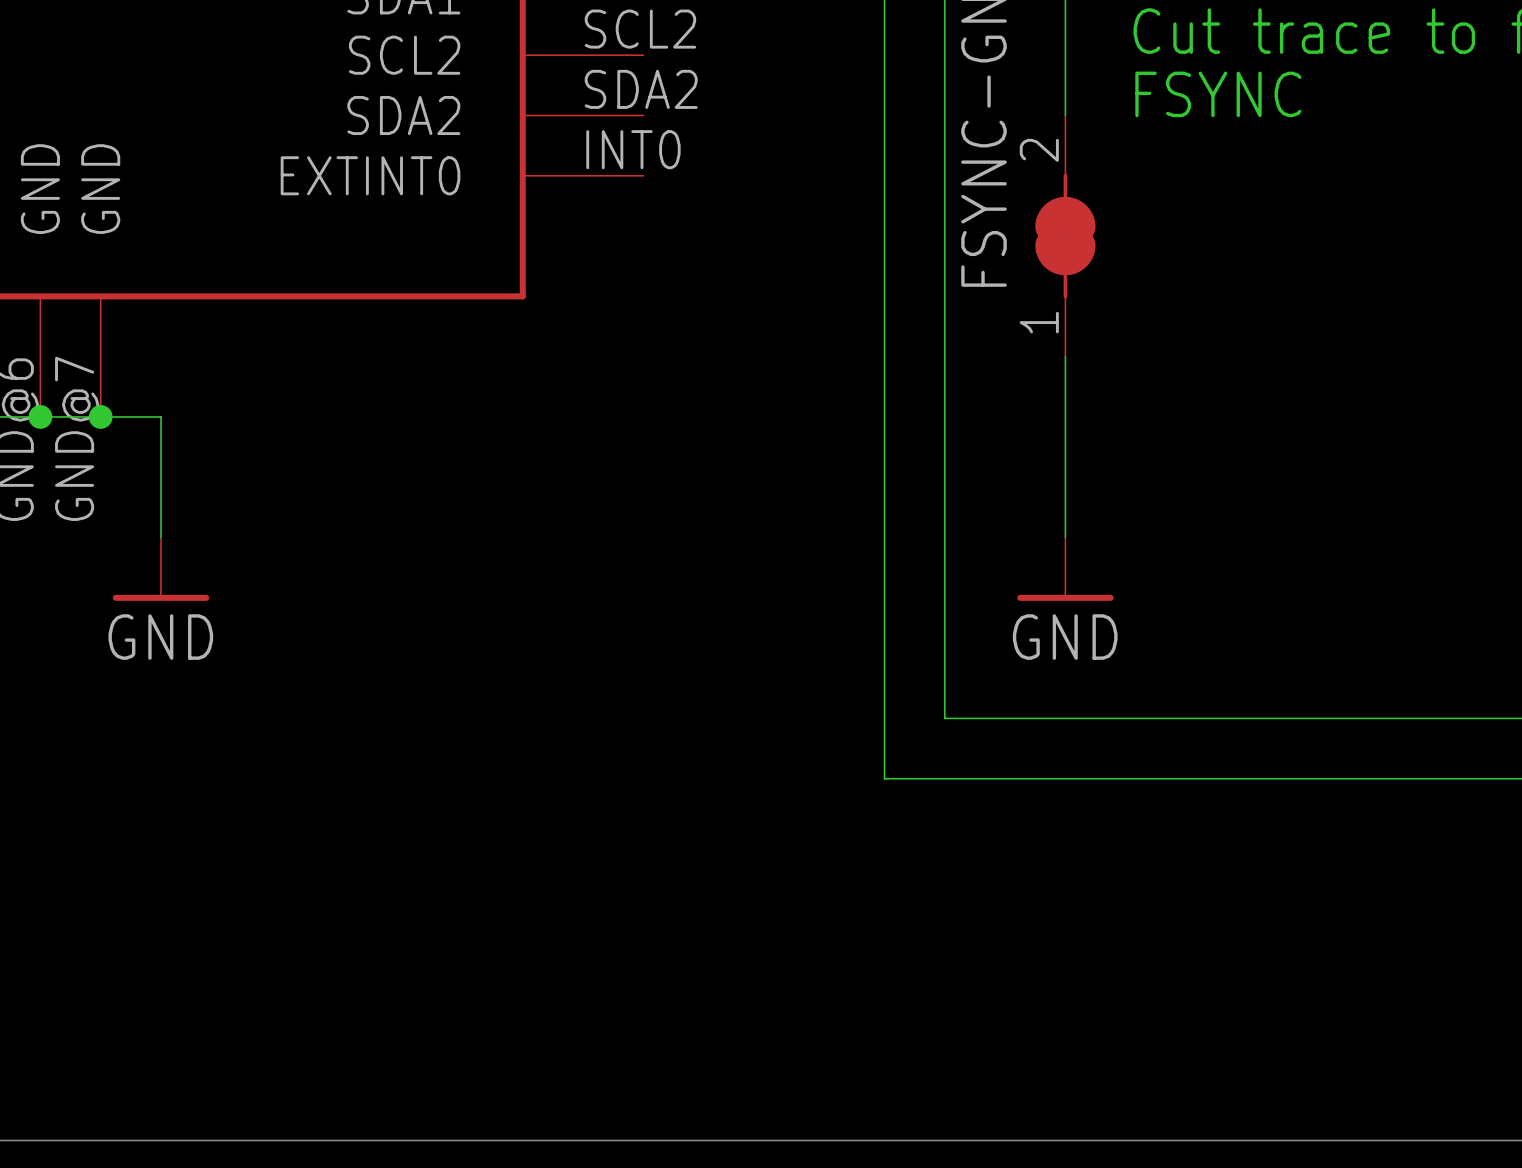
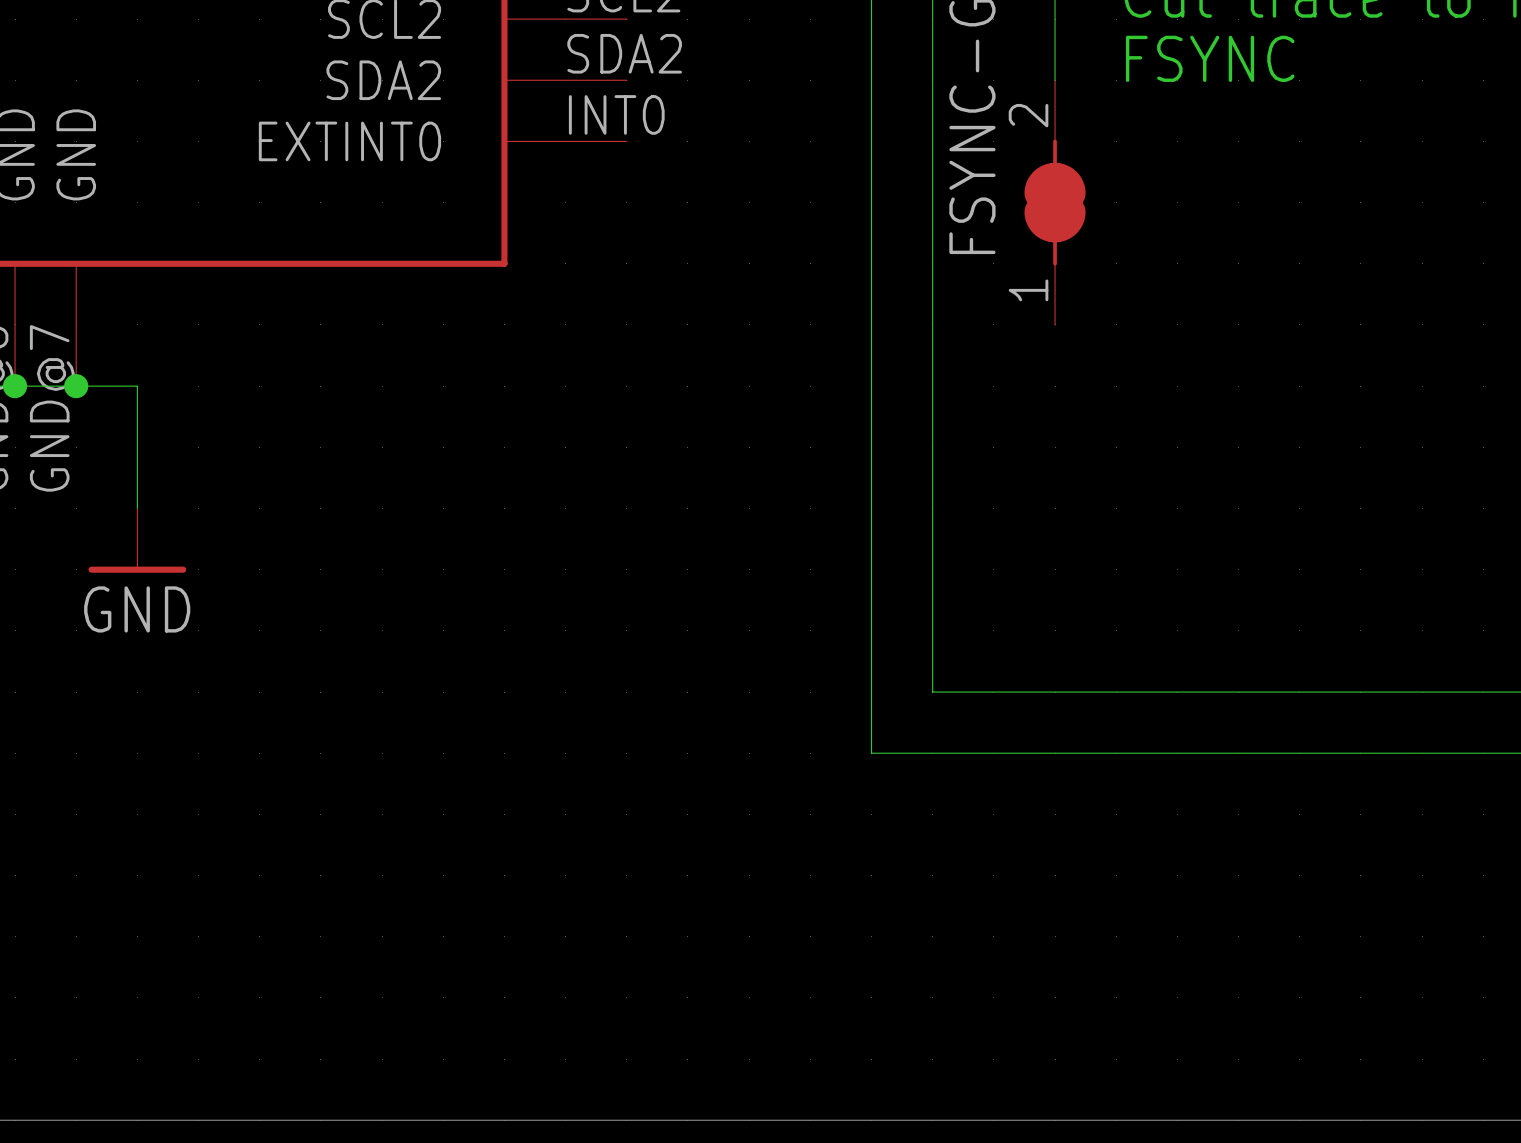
wire: (1065, 356) (1065, 537) -> none
power symbol: GND (1065, 569) -> none

